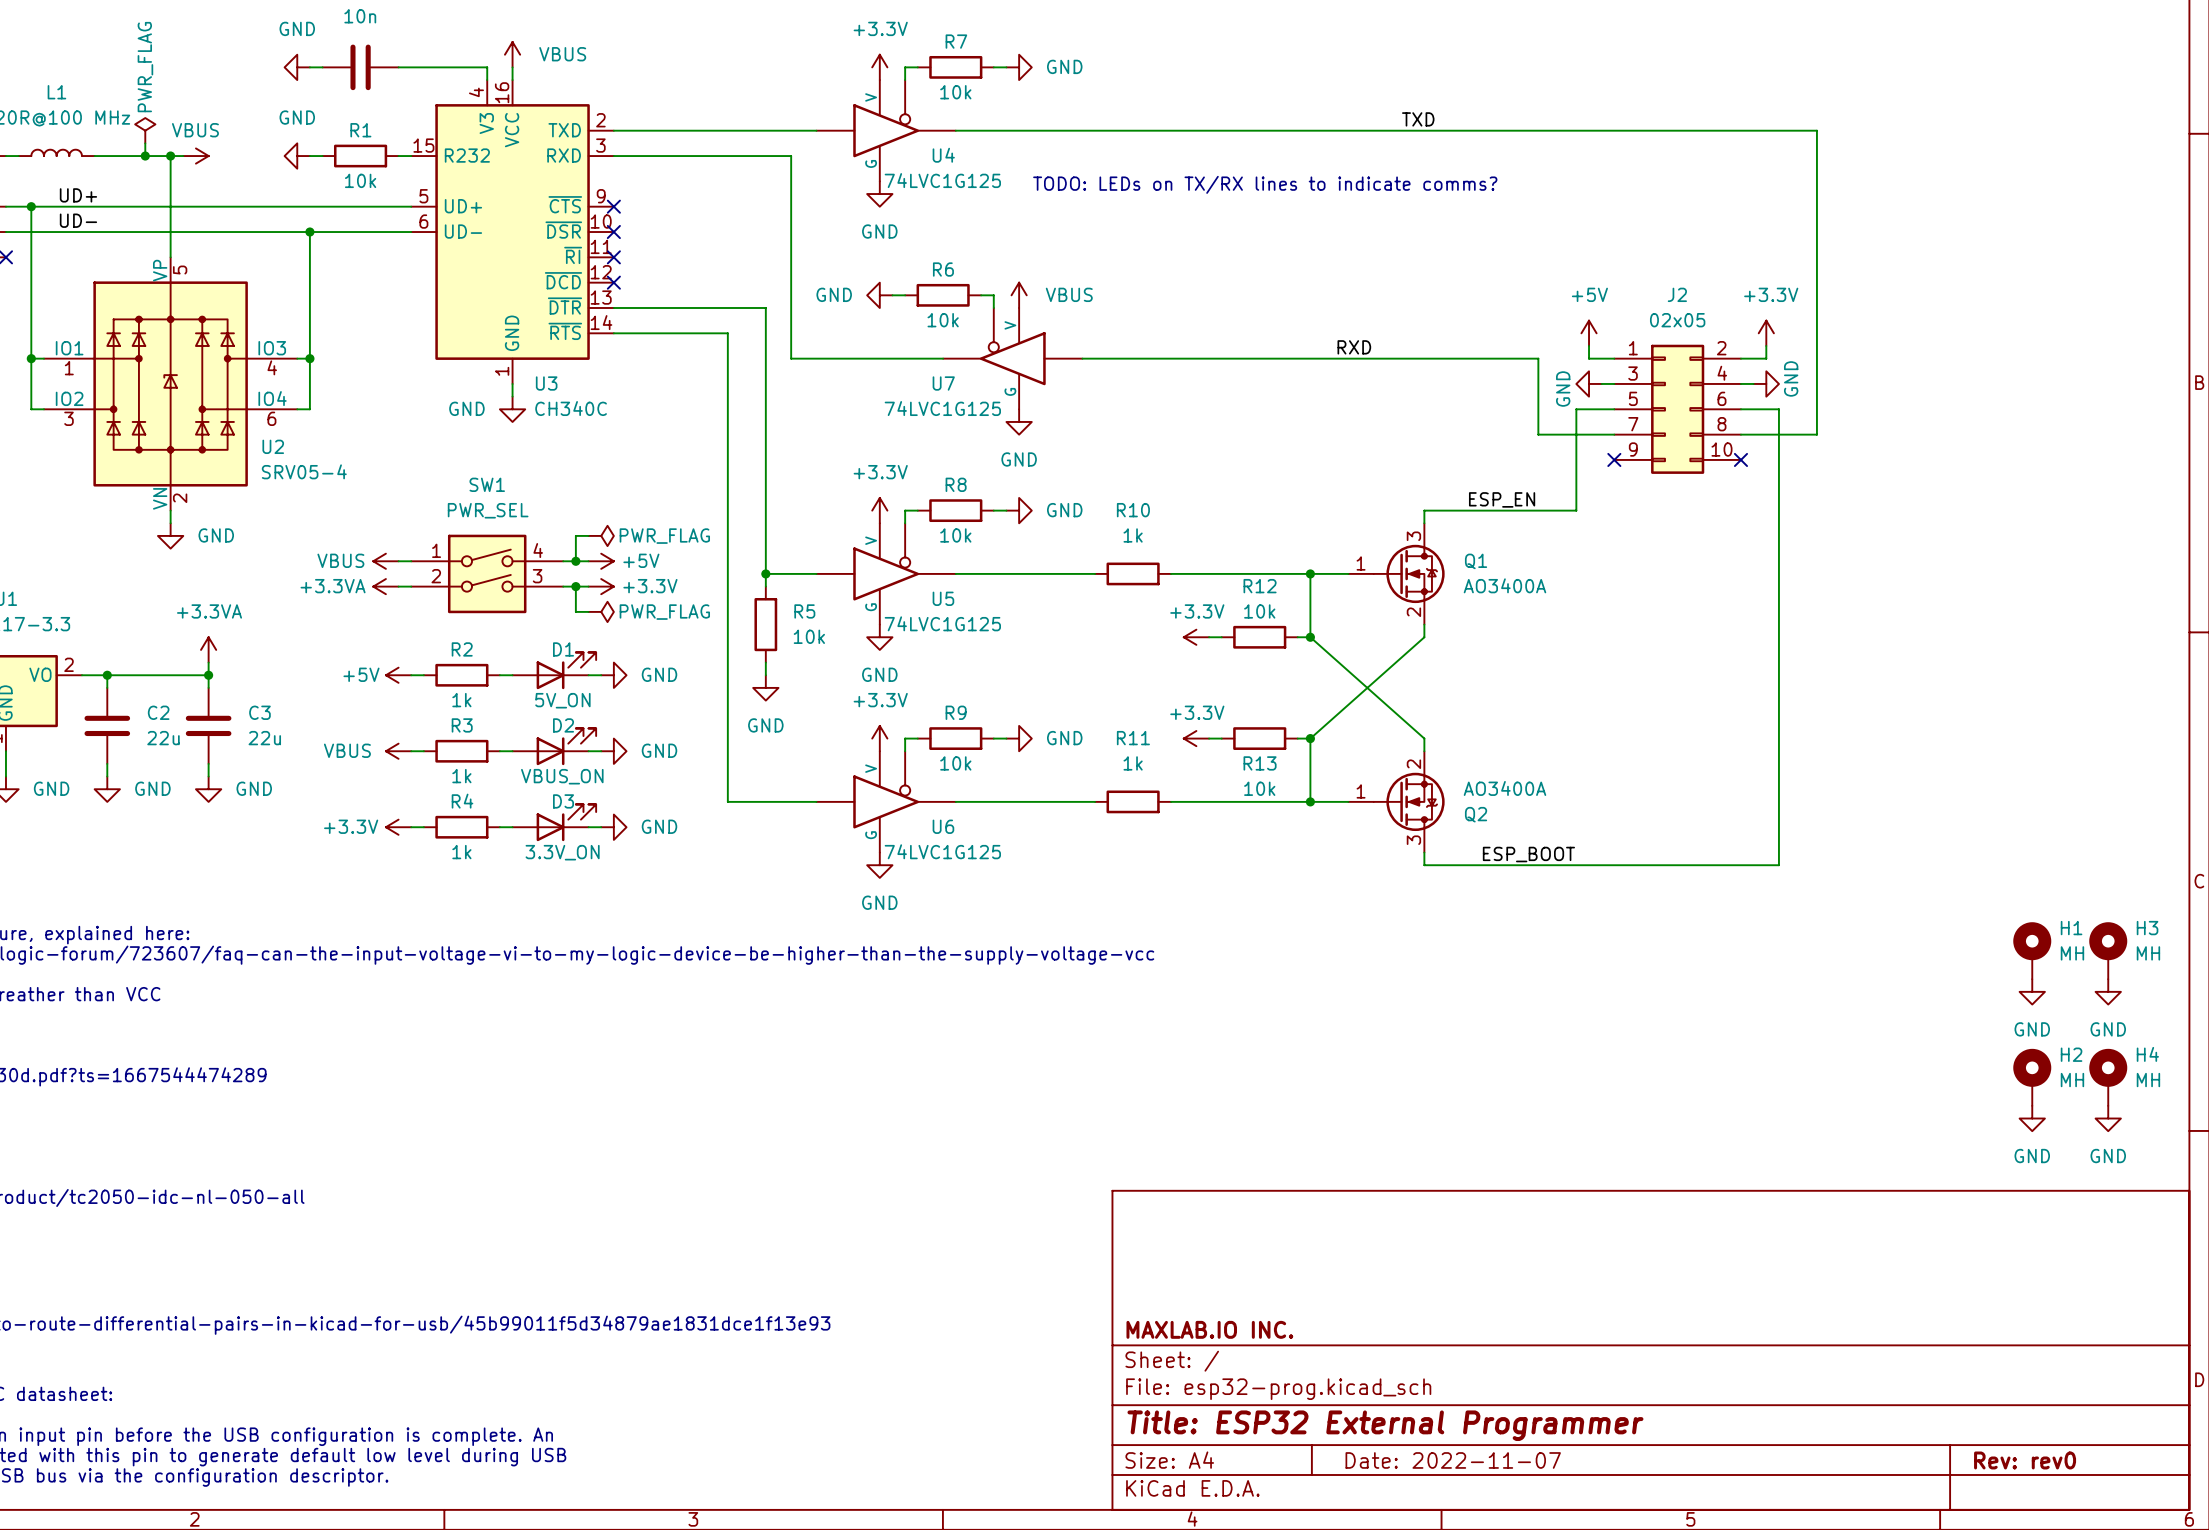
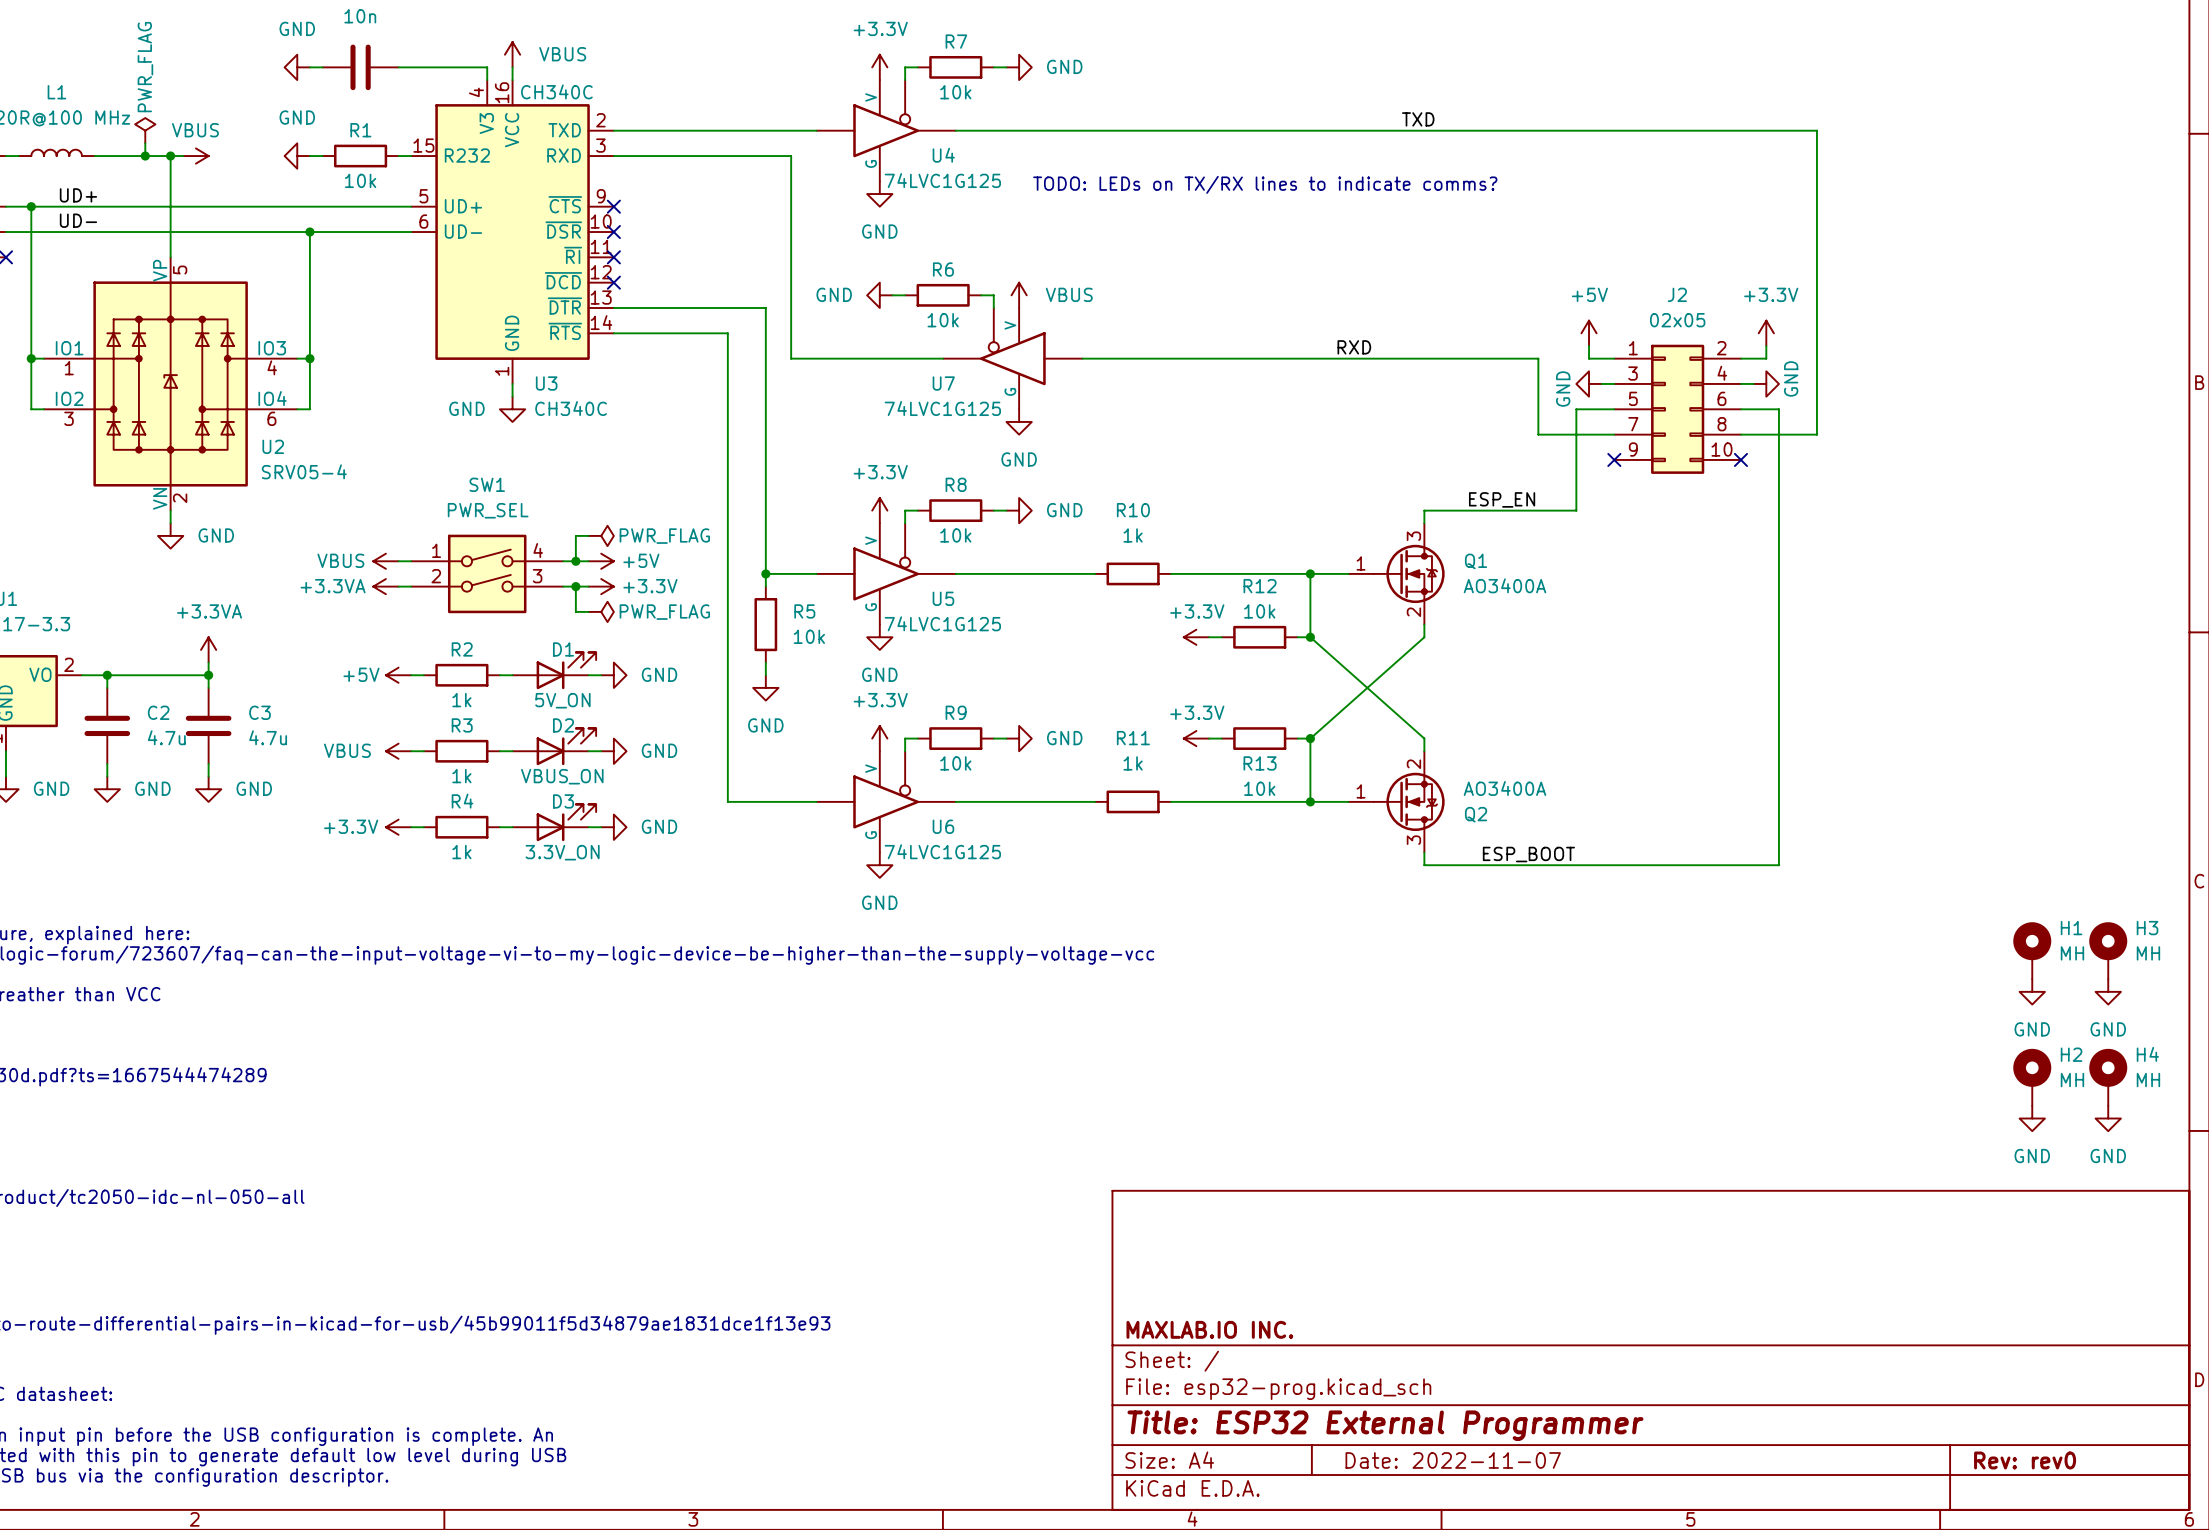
U3 text: none -> CH340C (556, 91)
C2 text: 22u (163, 738) -> 4.7u (166, 737)
C3 text: 22u (264, 738) -> 4.7u (268, 737)

